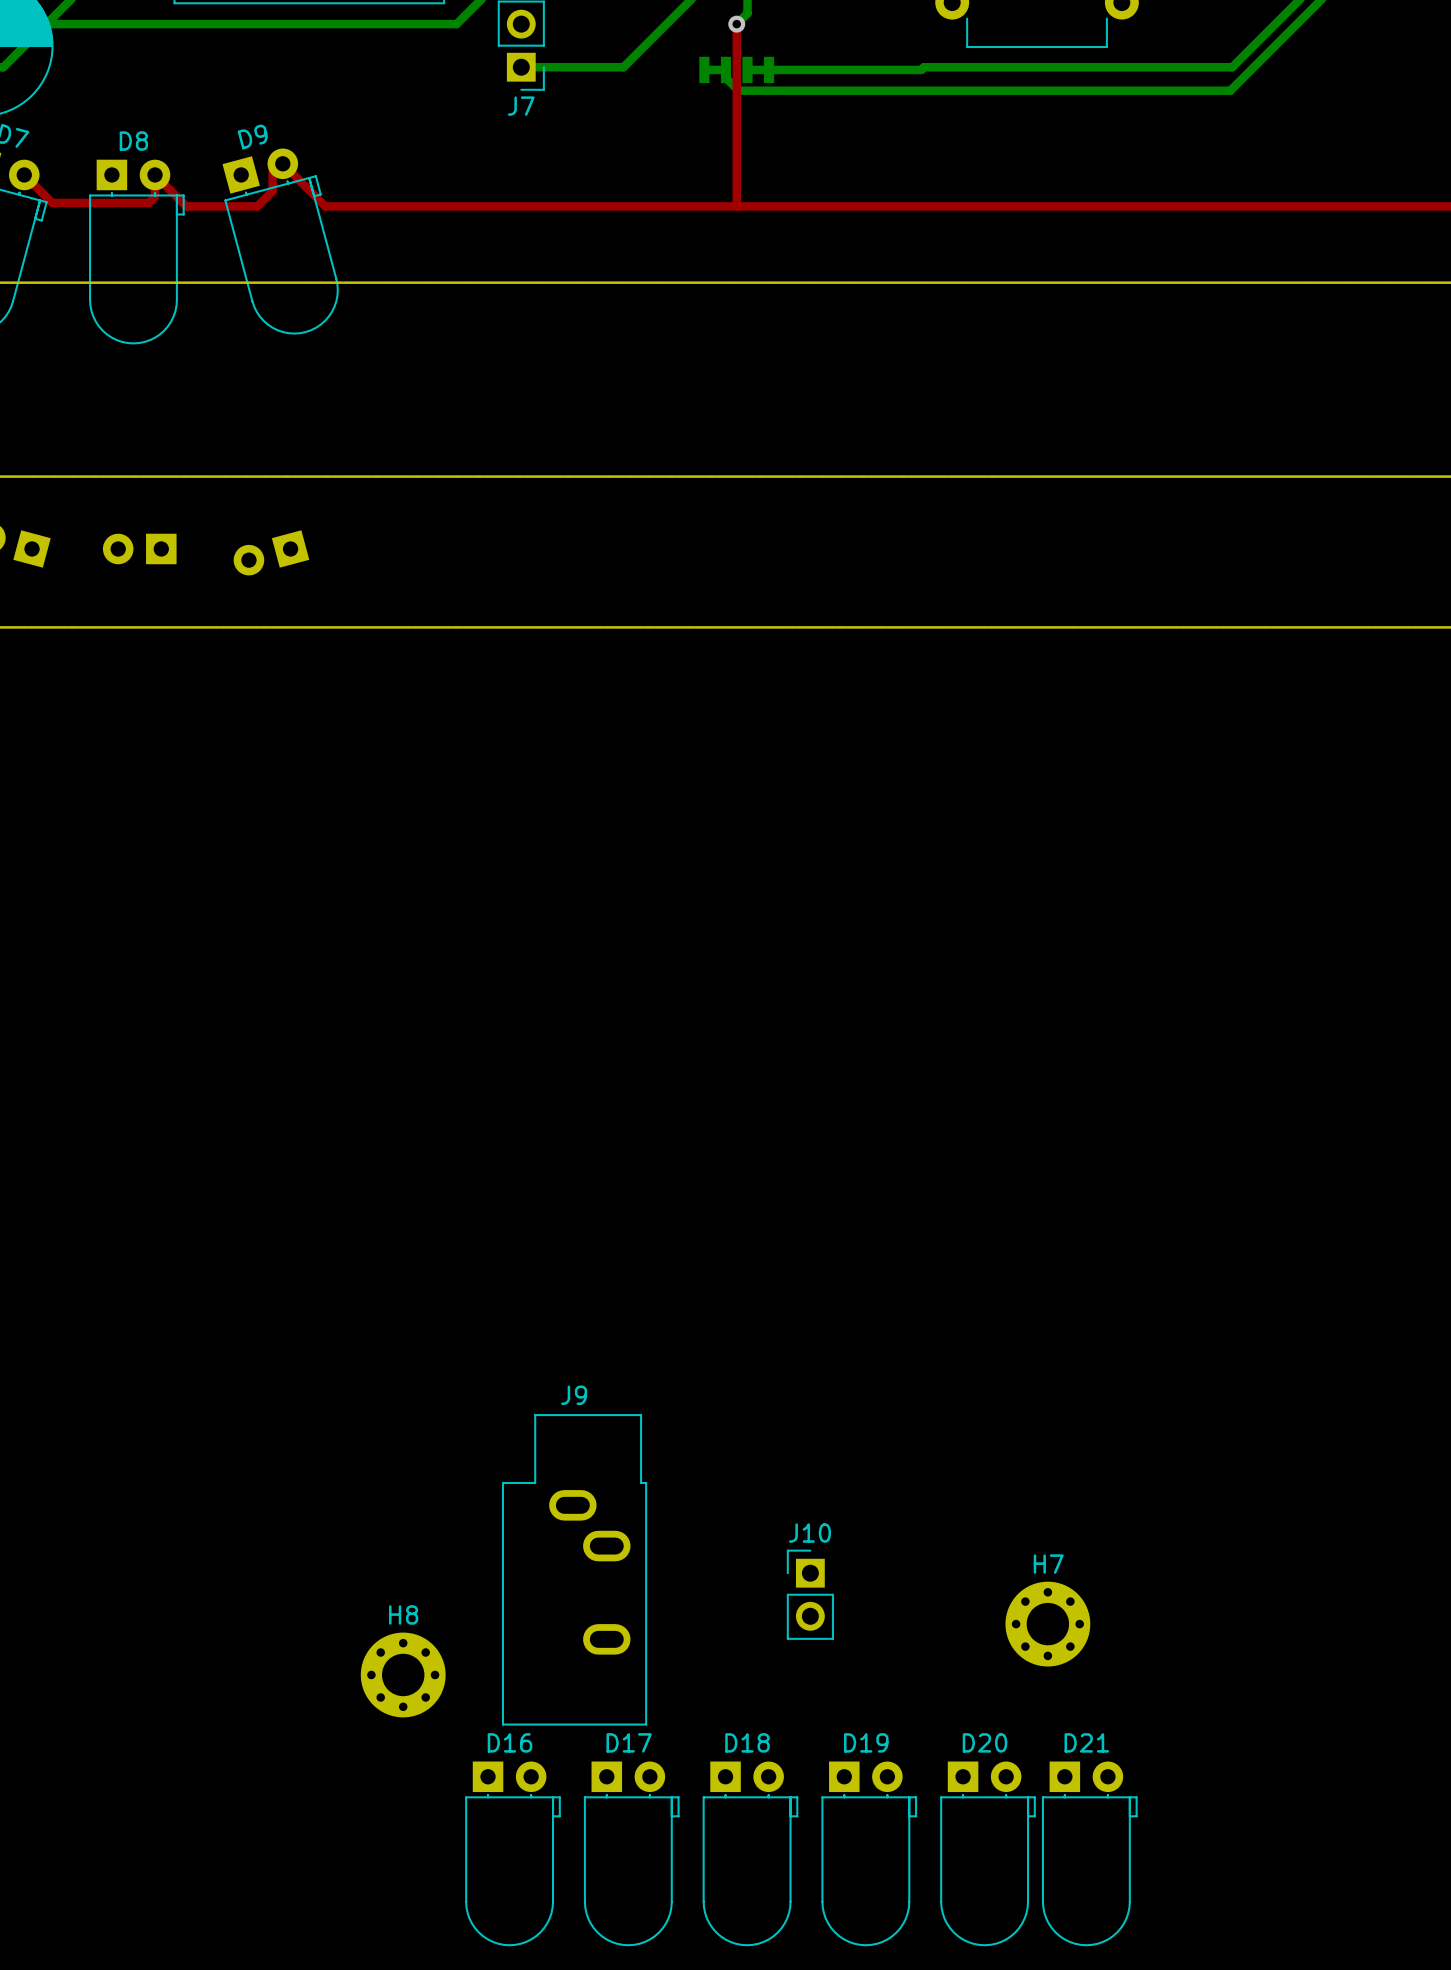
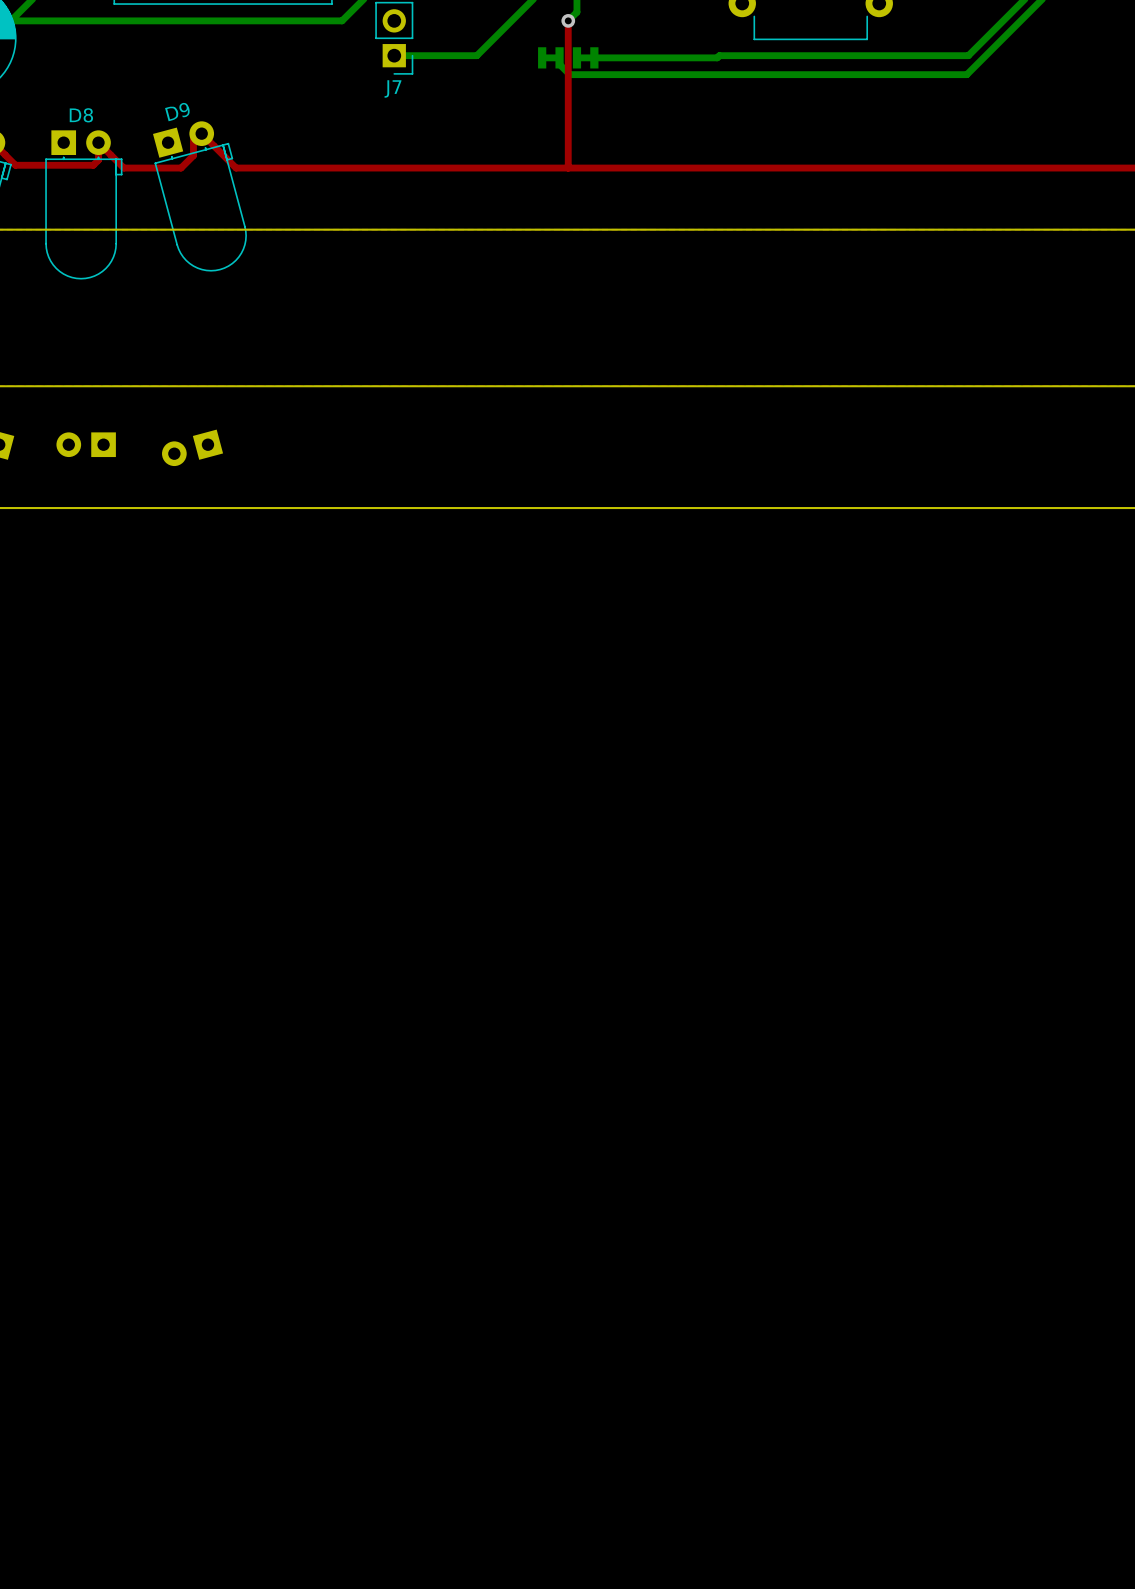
J9: (574, 1569) -> none
J10: (810, 1594) -> none
H7: (1047, 1624) -> none
H8: (403, 1674) -> none
D16: (512, 1853) -> none
D17: (631, 1853) -> none
D18: (750, 1853) -> none
D19: (869, 1853) -> none
D20: (987, 1853) -> none
D21: (1089, 1853) -> none

